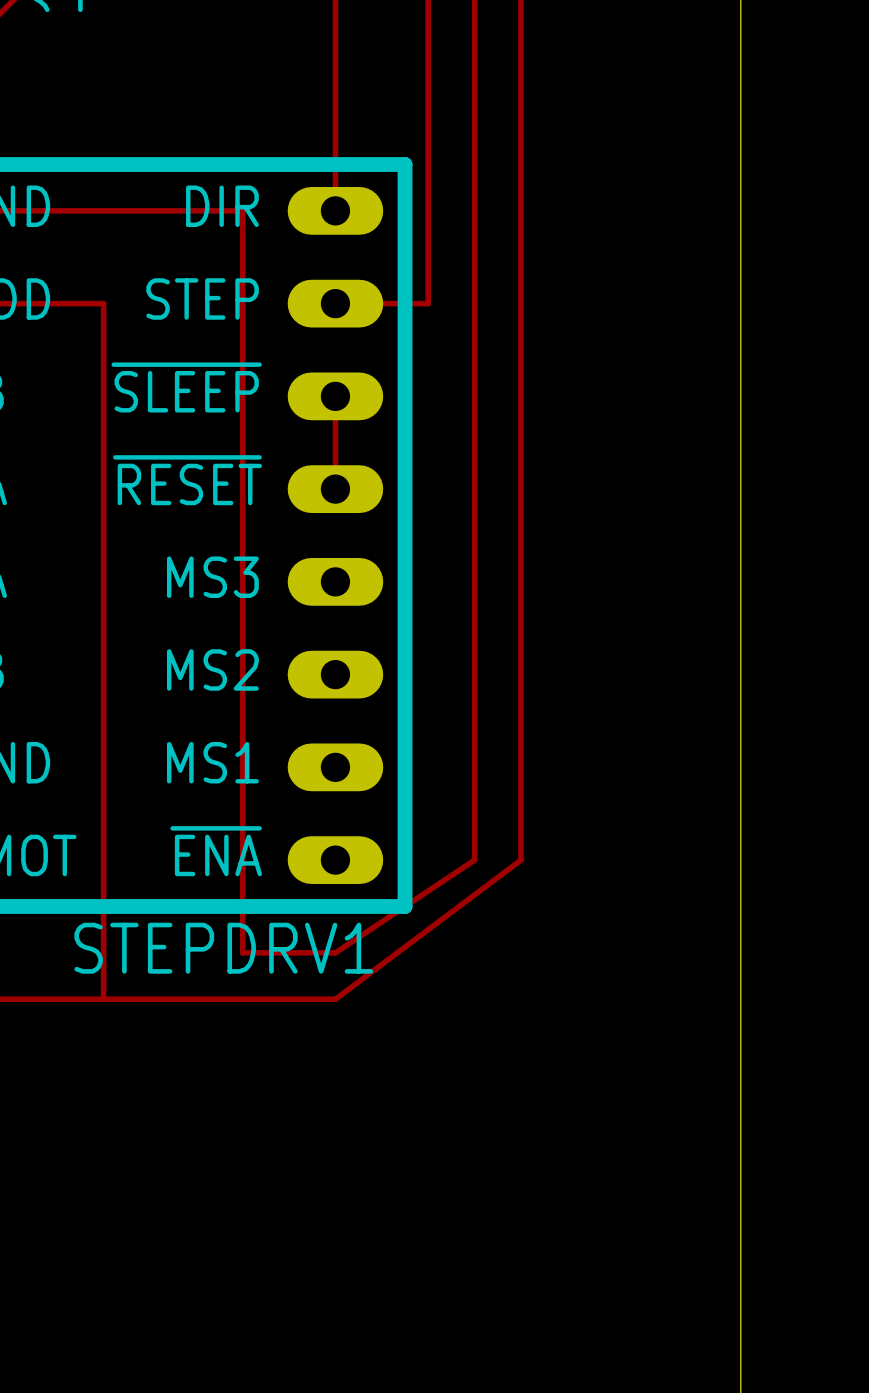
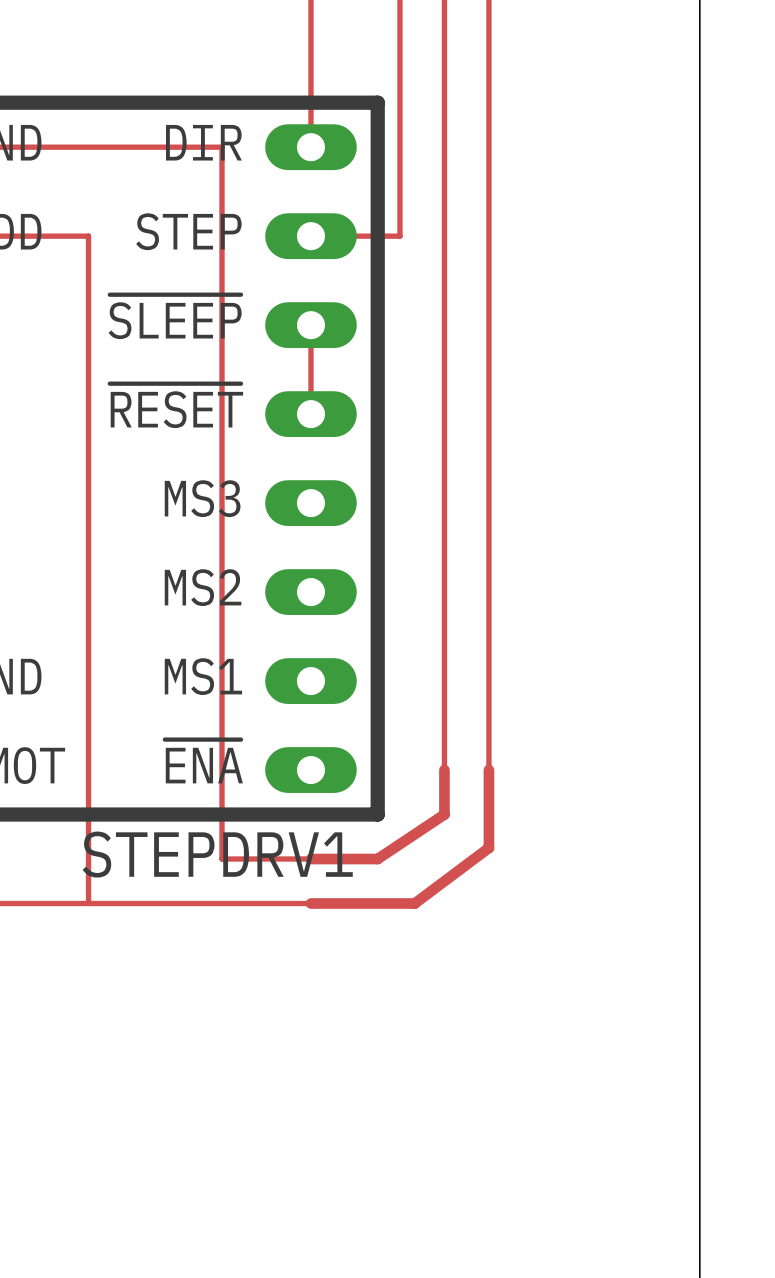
top track: (474, 860) (335, 952) -> (444, 770) (444, 814) (377, 859) (310, 859)
top track: (520, 860) (335, 999) -> (488, 770) (488, 847) (414, 903) (310, 903)

